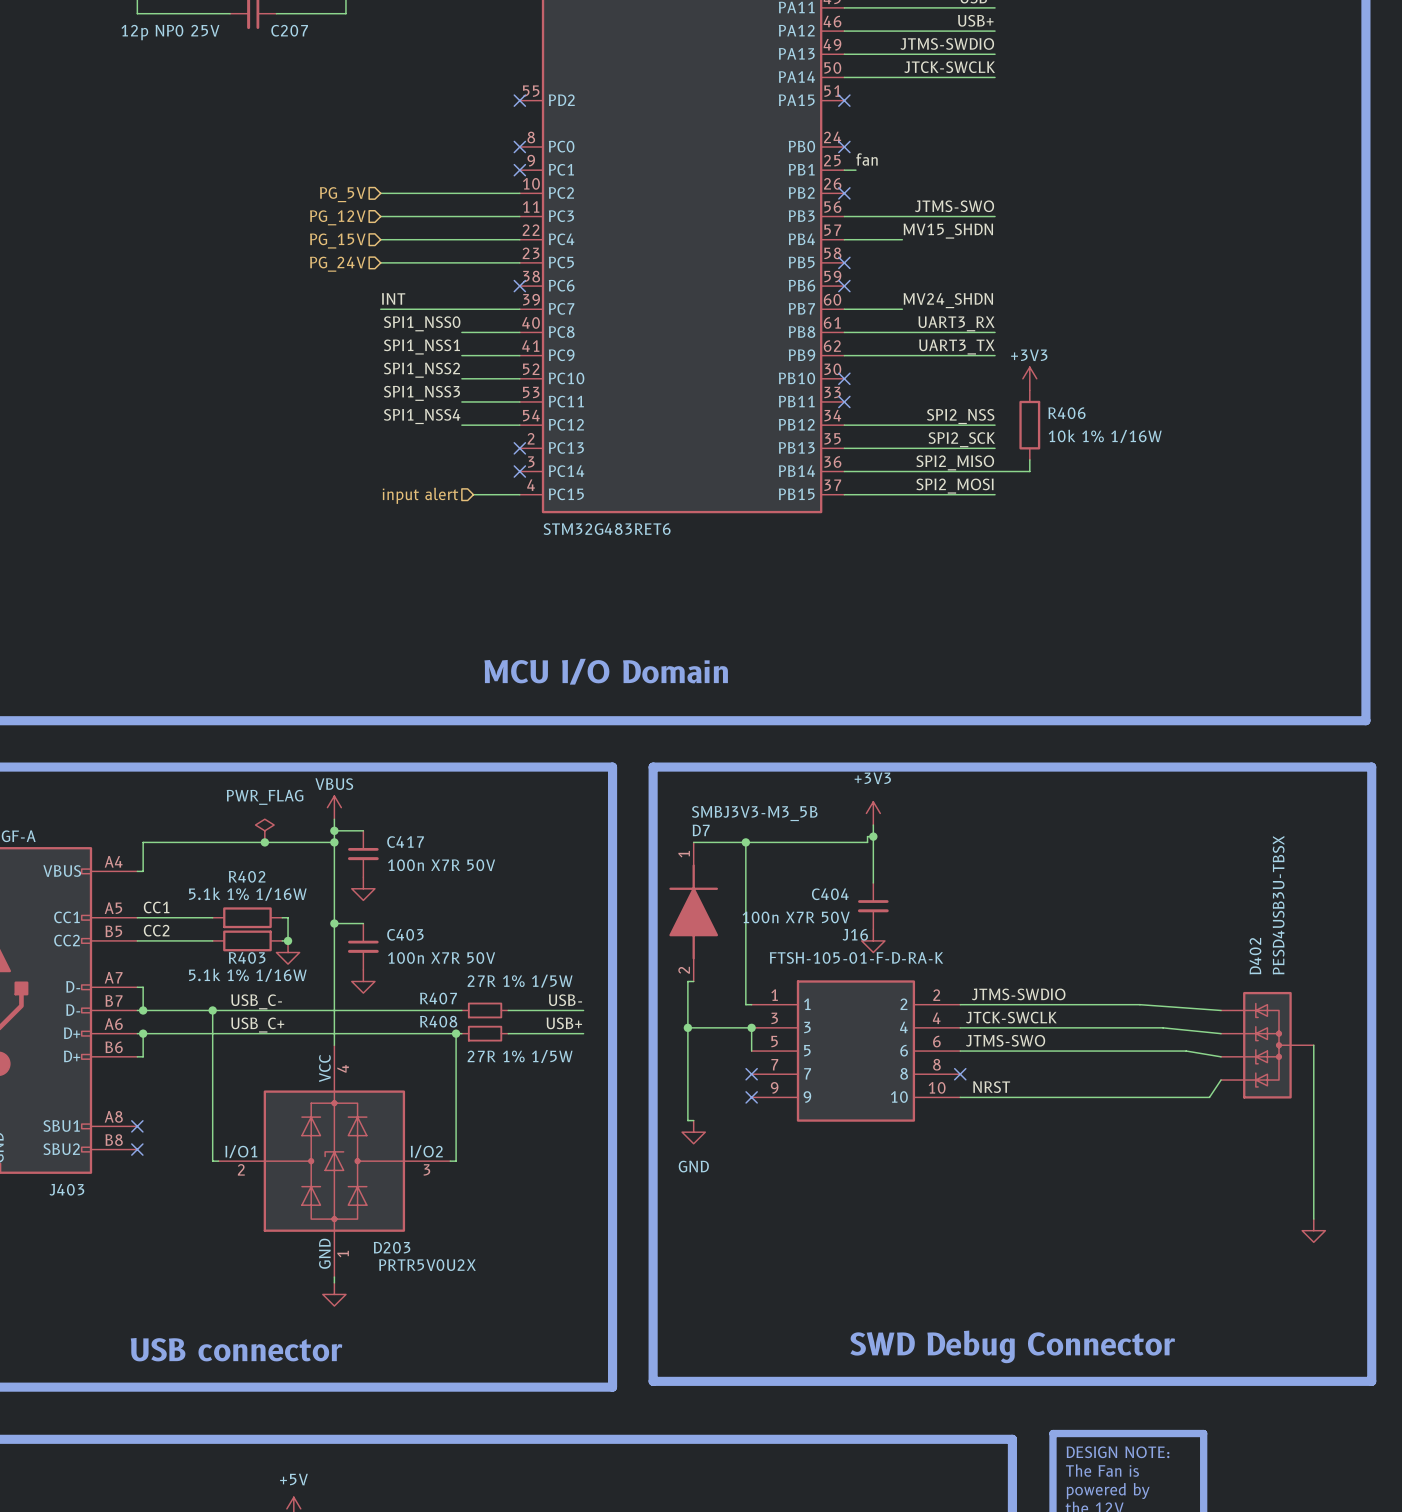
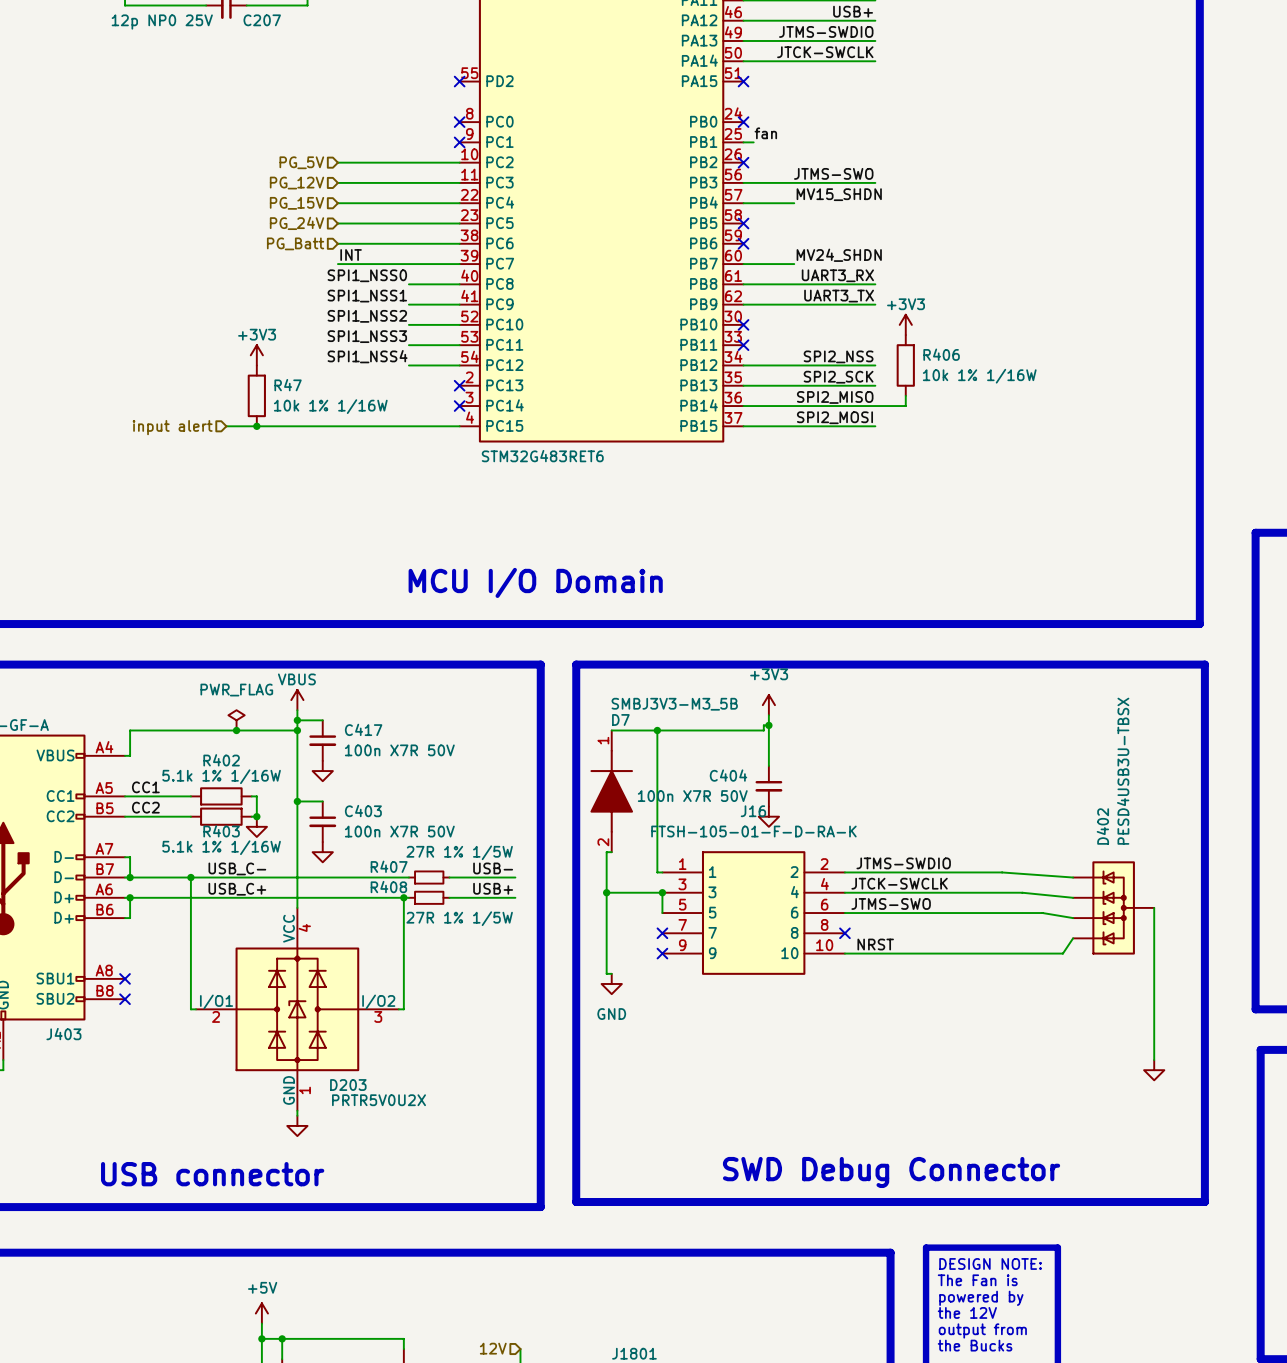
wire: none -> (337, 243) (459, 243)
no-connect mark: (519, 286) -> none
hierarchical label: none -> PG_Batt (295, 243)
power symbol: none -> +3V3 (256, 355)
R47: none -> 10k 1% 1/16W (256, 395)
wire: none -> (226, 426) (419, 426)
junction: none -> (256, 426)
hierarchical label position: input alert (420, 495) -> input alert (172, 427)

